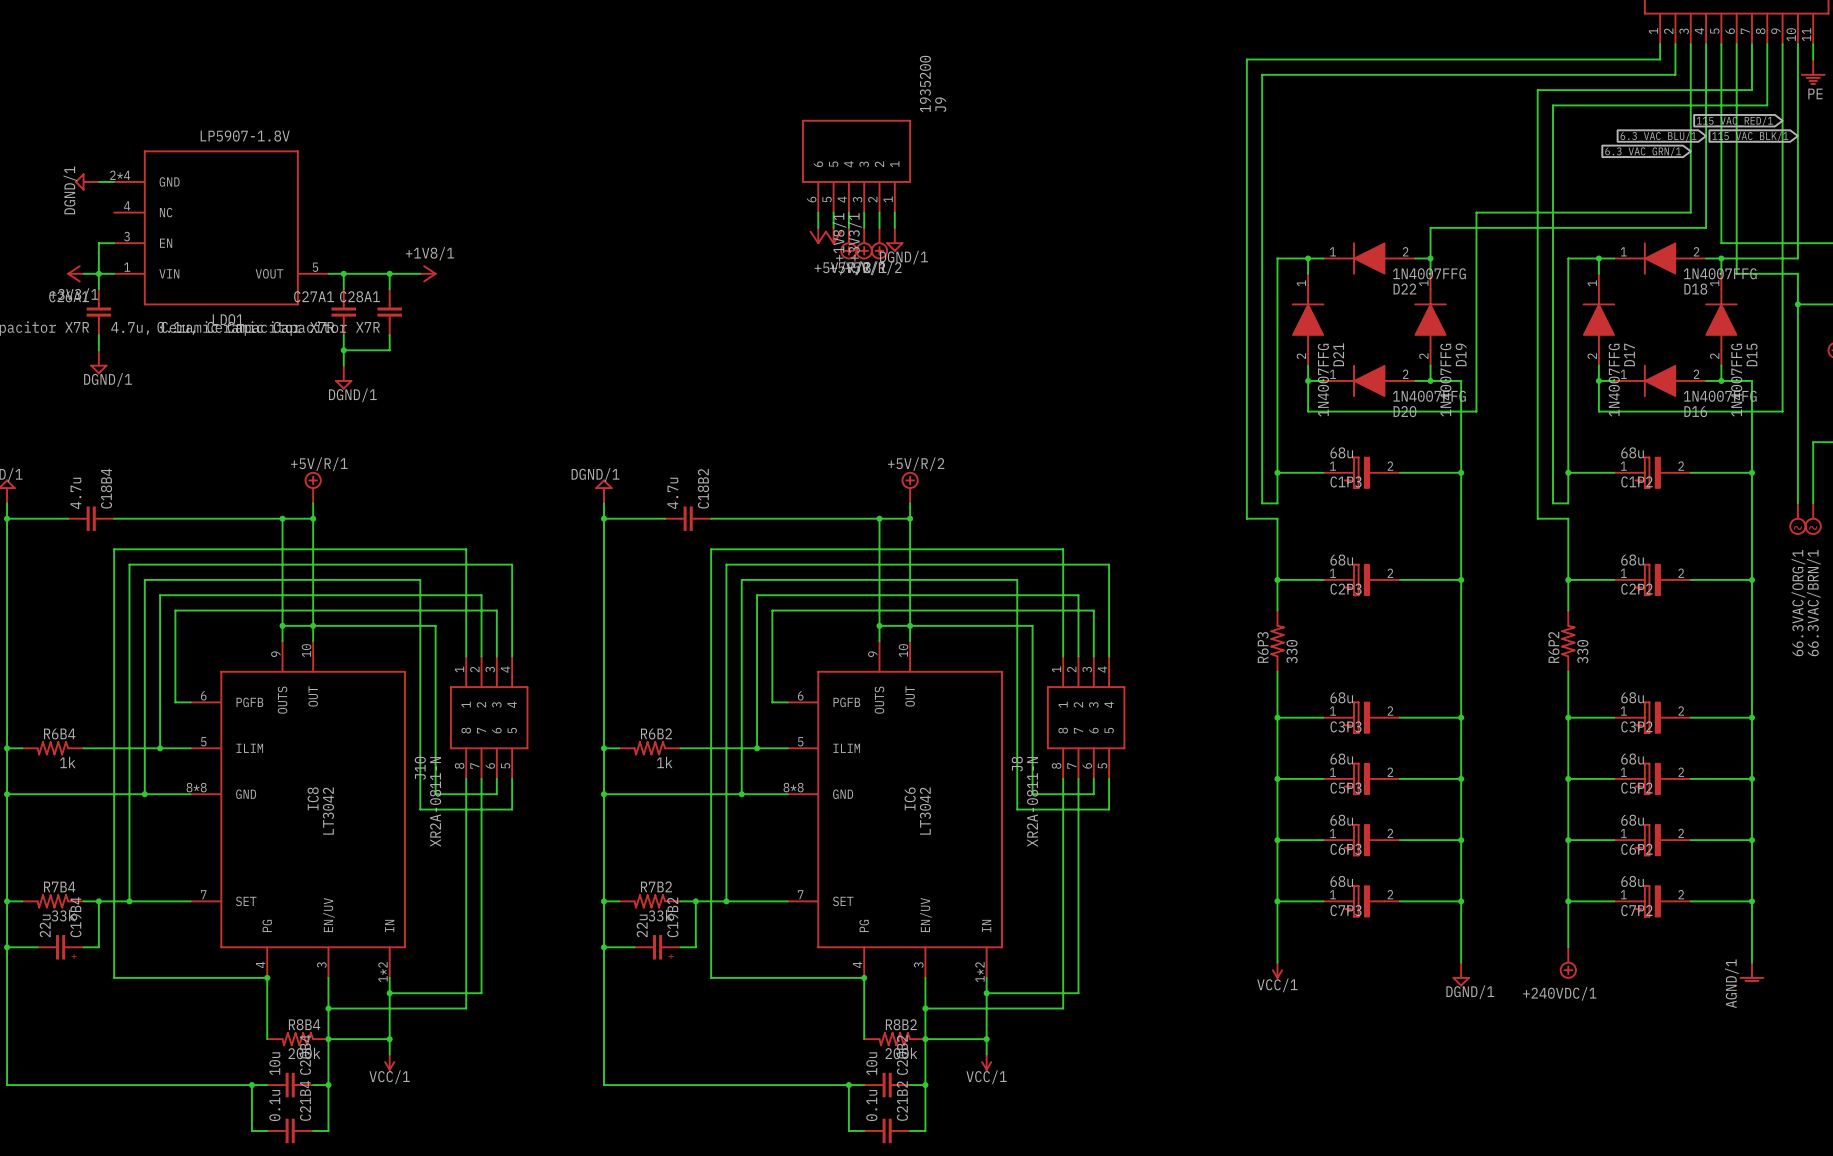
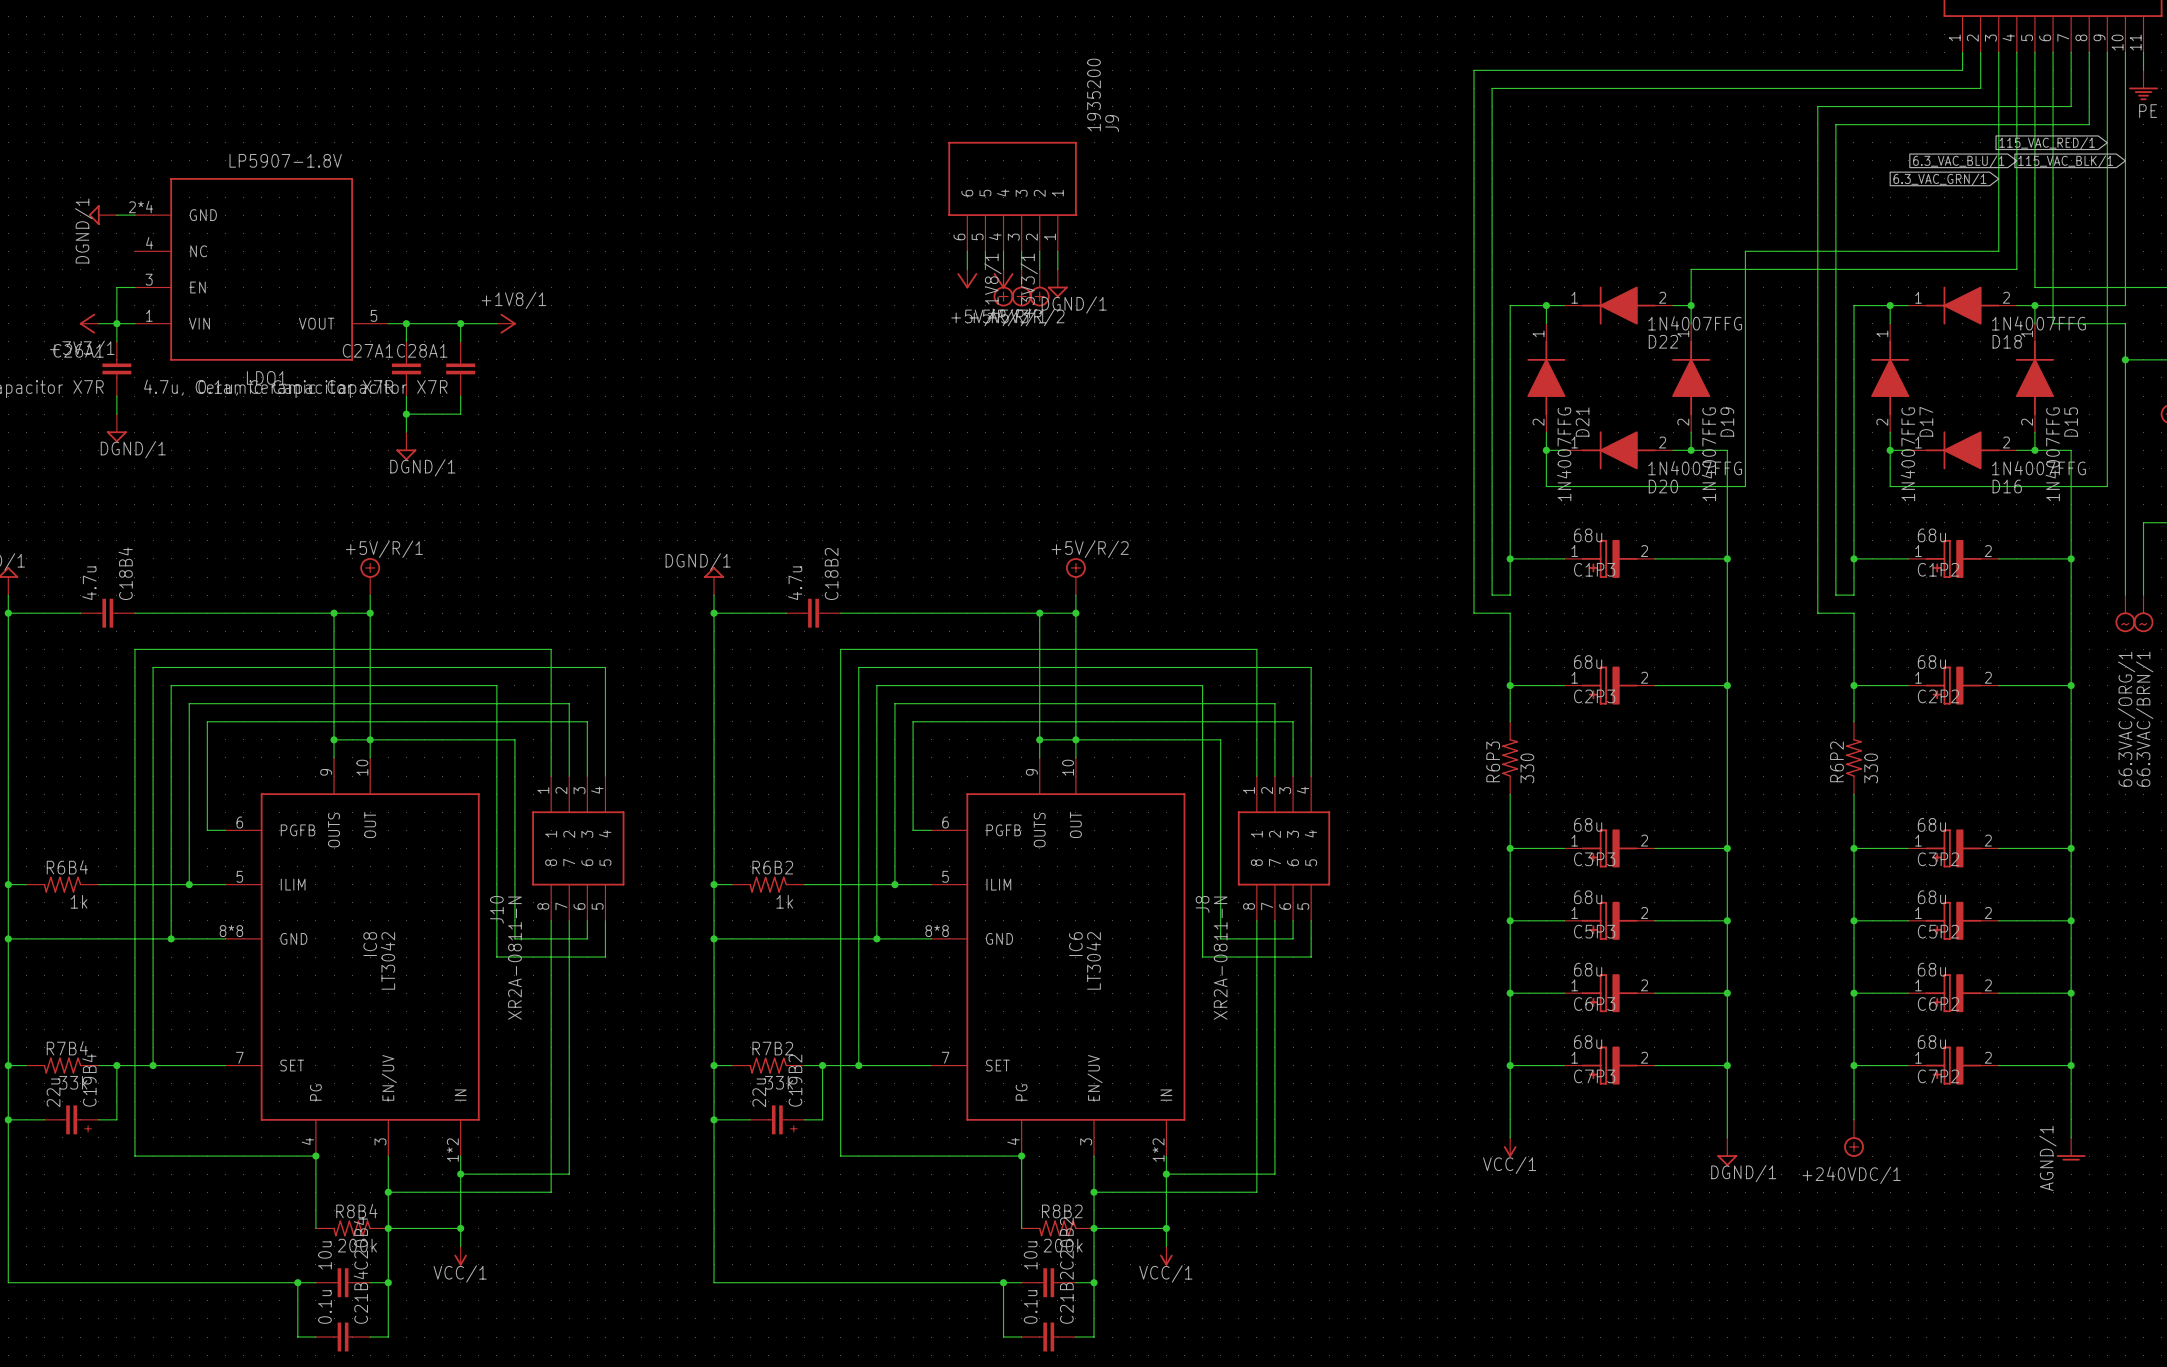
power symbol position: +3V3/1 (833, 235) -> +3V3/1 (1003, 278)

